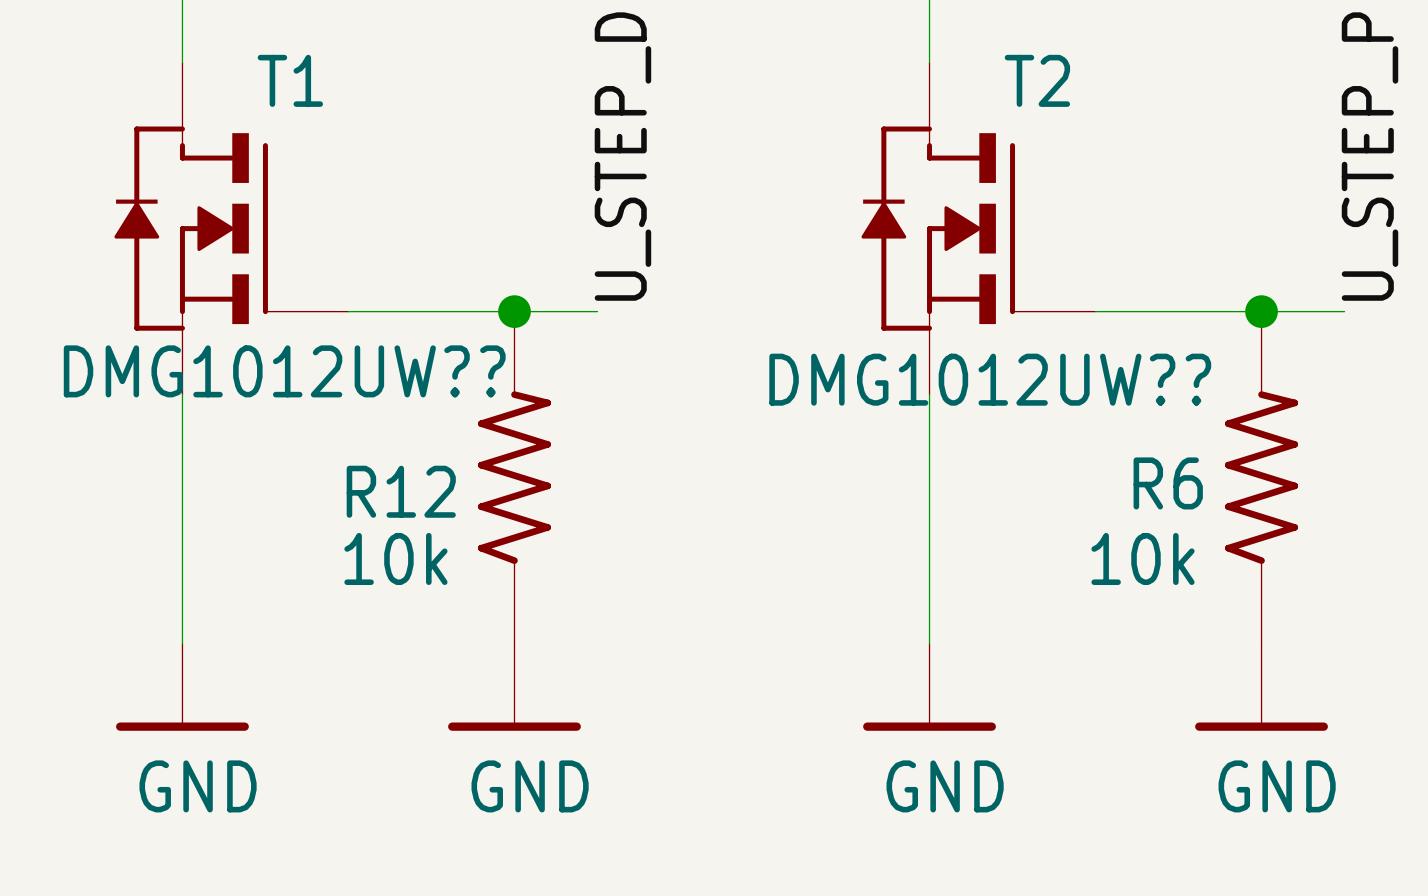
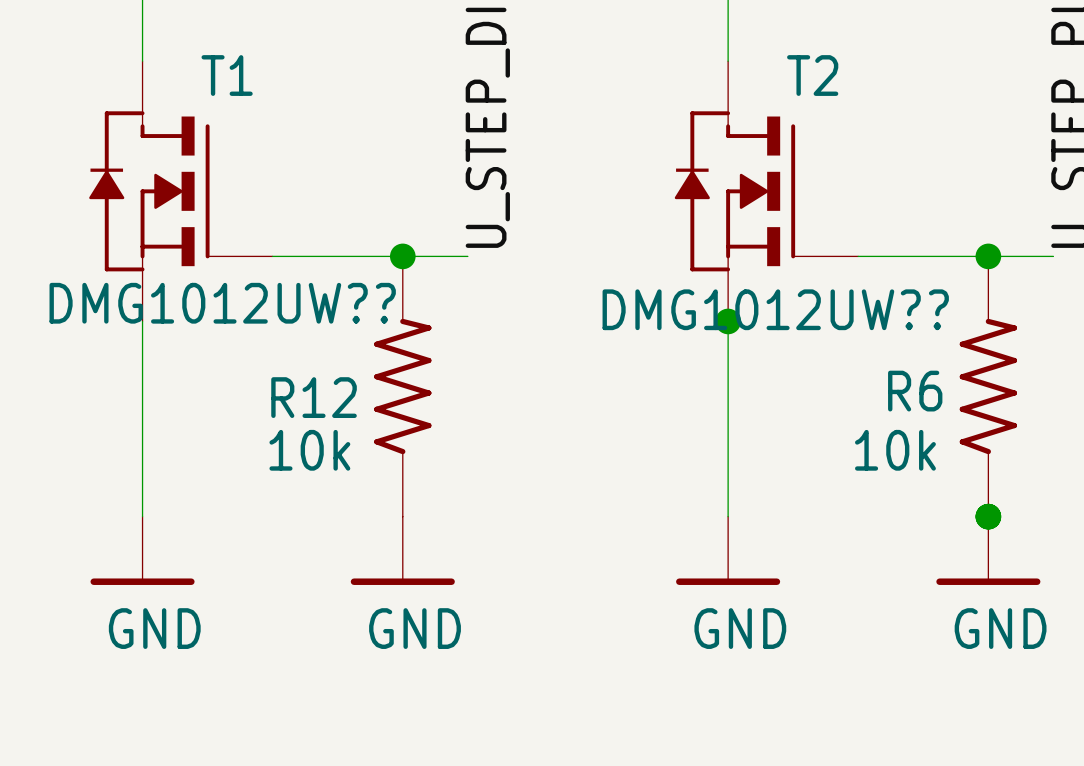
junction: none -> (728, 321)
junction: none -> (988, 516)

